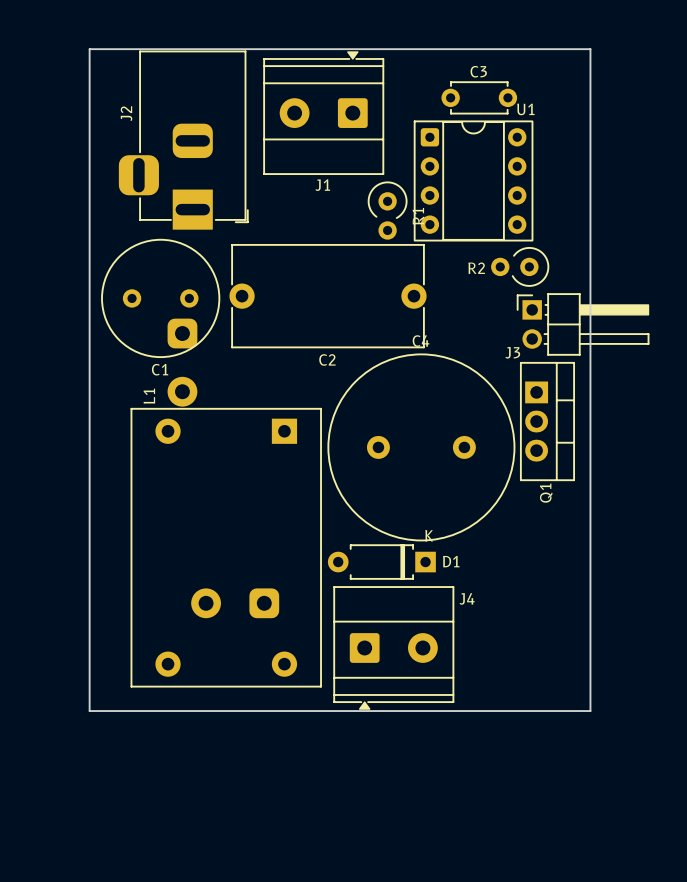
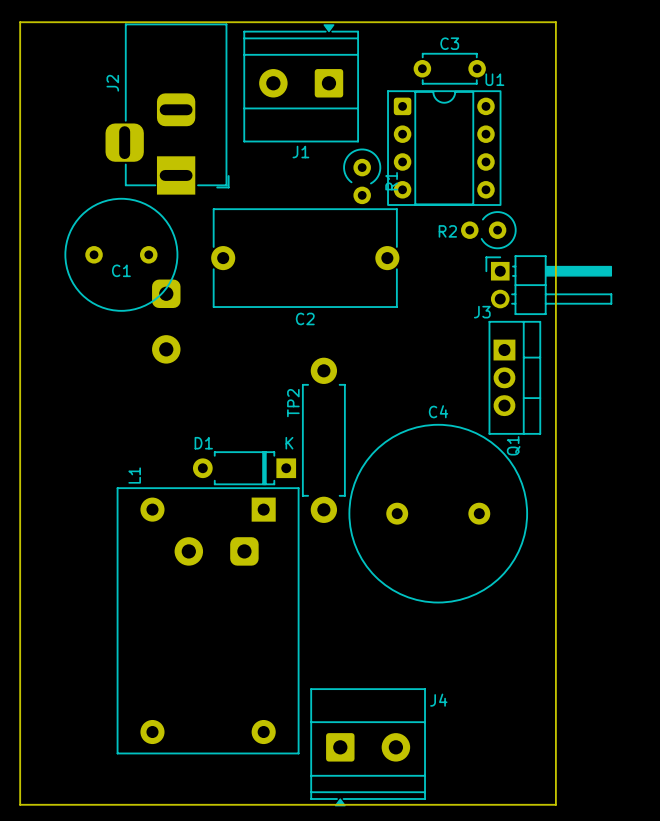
board edge: (89, 49) (89, 711) (590, 711) -> (77, 22) (20, 22) (20, 804) (555, 804) (555, 654)
C1 position: (160, 298) -> (121, 254)
C1 name position: C1 (160, 369) -> C1 (121, 270)
C4 position: (421, 447) -> (438, 513)
TP2: none -> (323, 440)
L1 position: (226, 547) -> (208, 620)
D1 name position: D1 (451, 561) -> D1 (203, 443)
D1 position: (381, 562) -> (244, 468)
J4 position: (393, 648) -> (368, 747)

